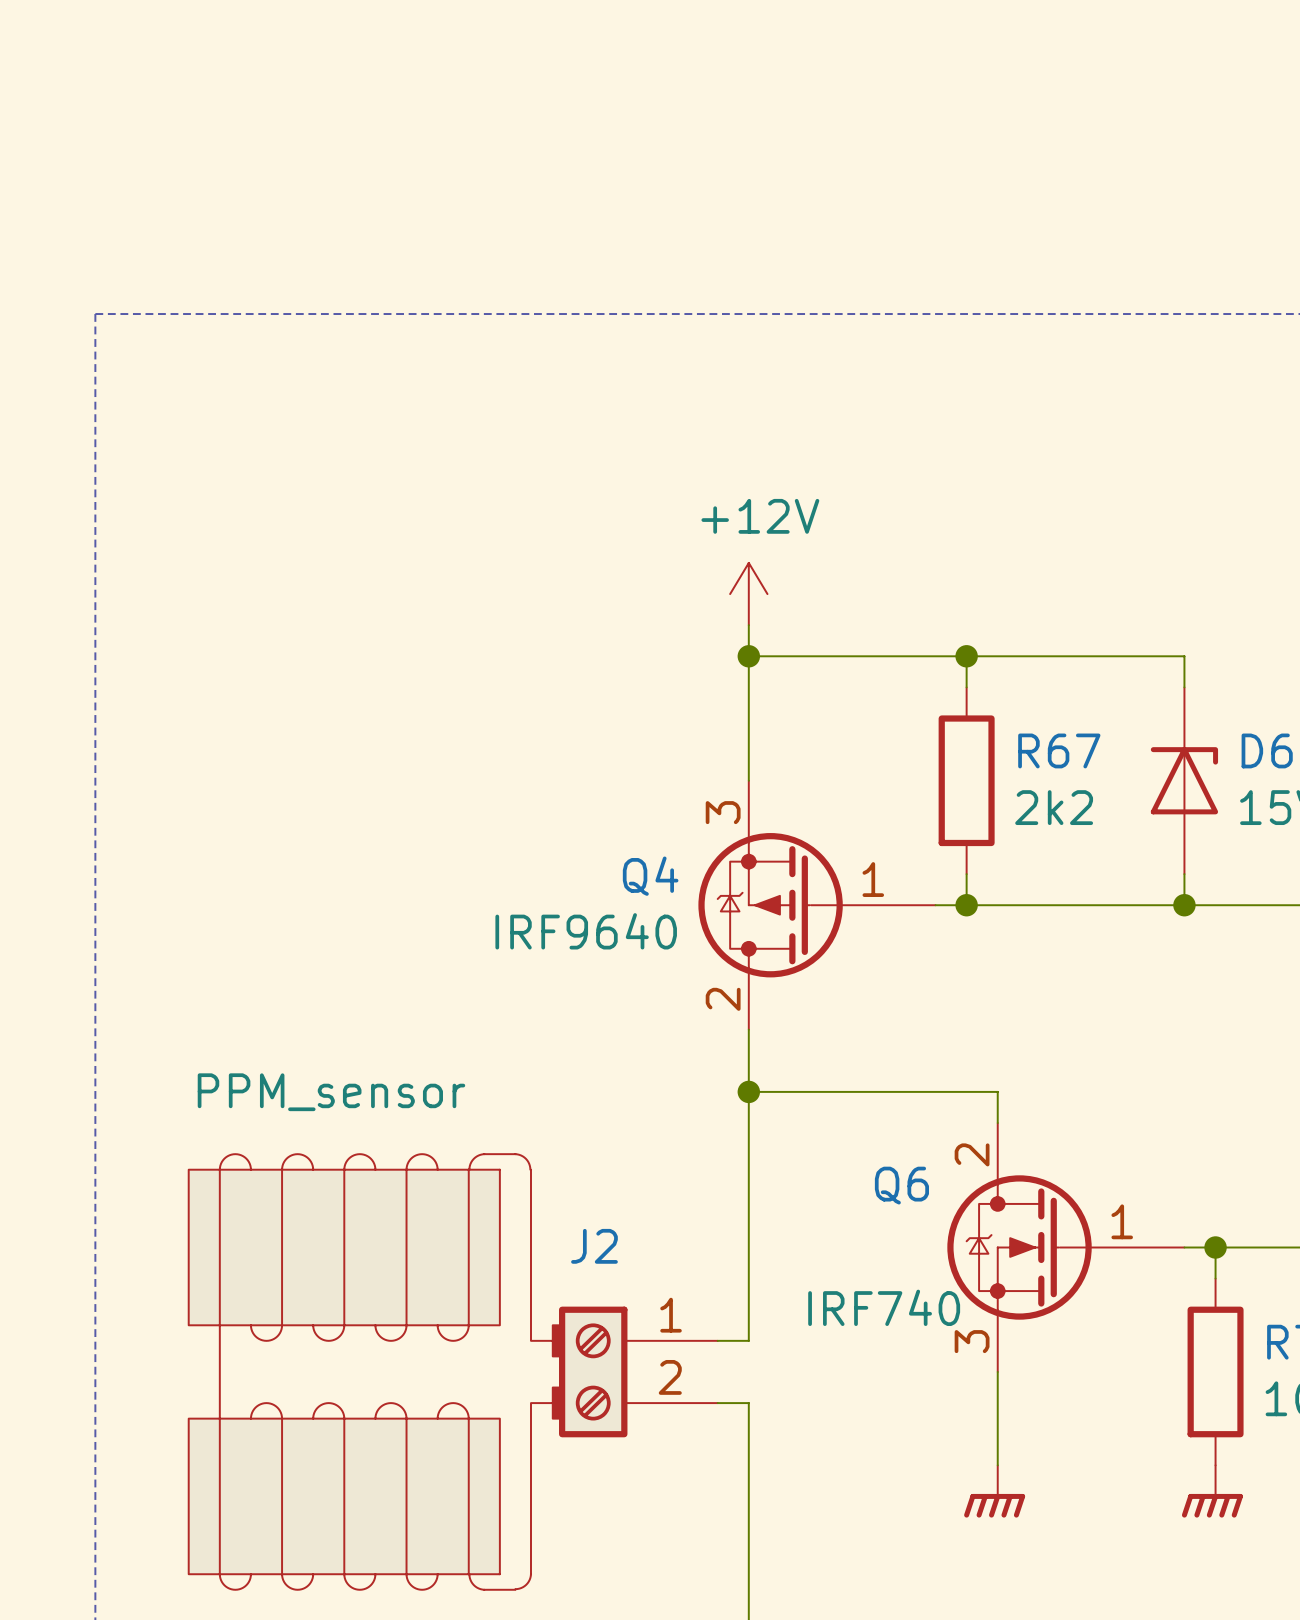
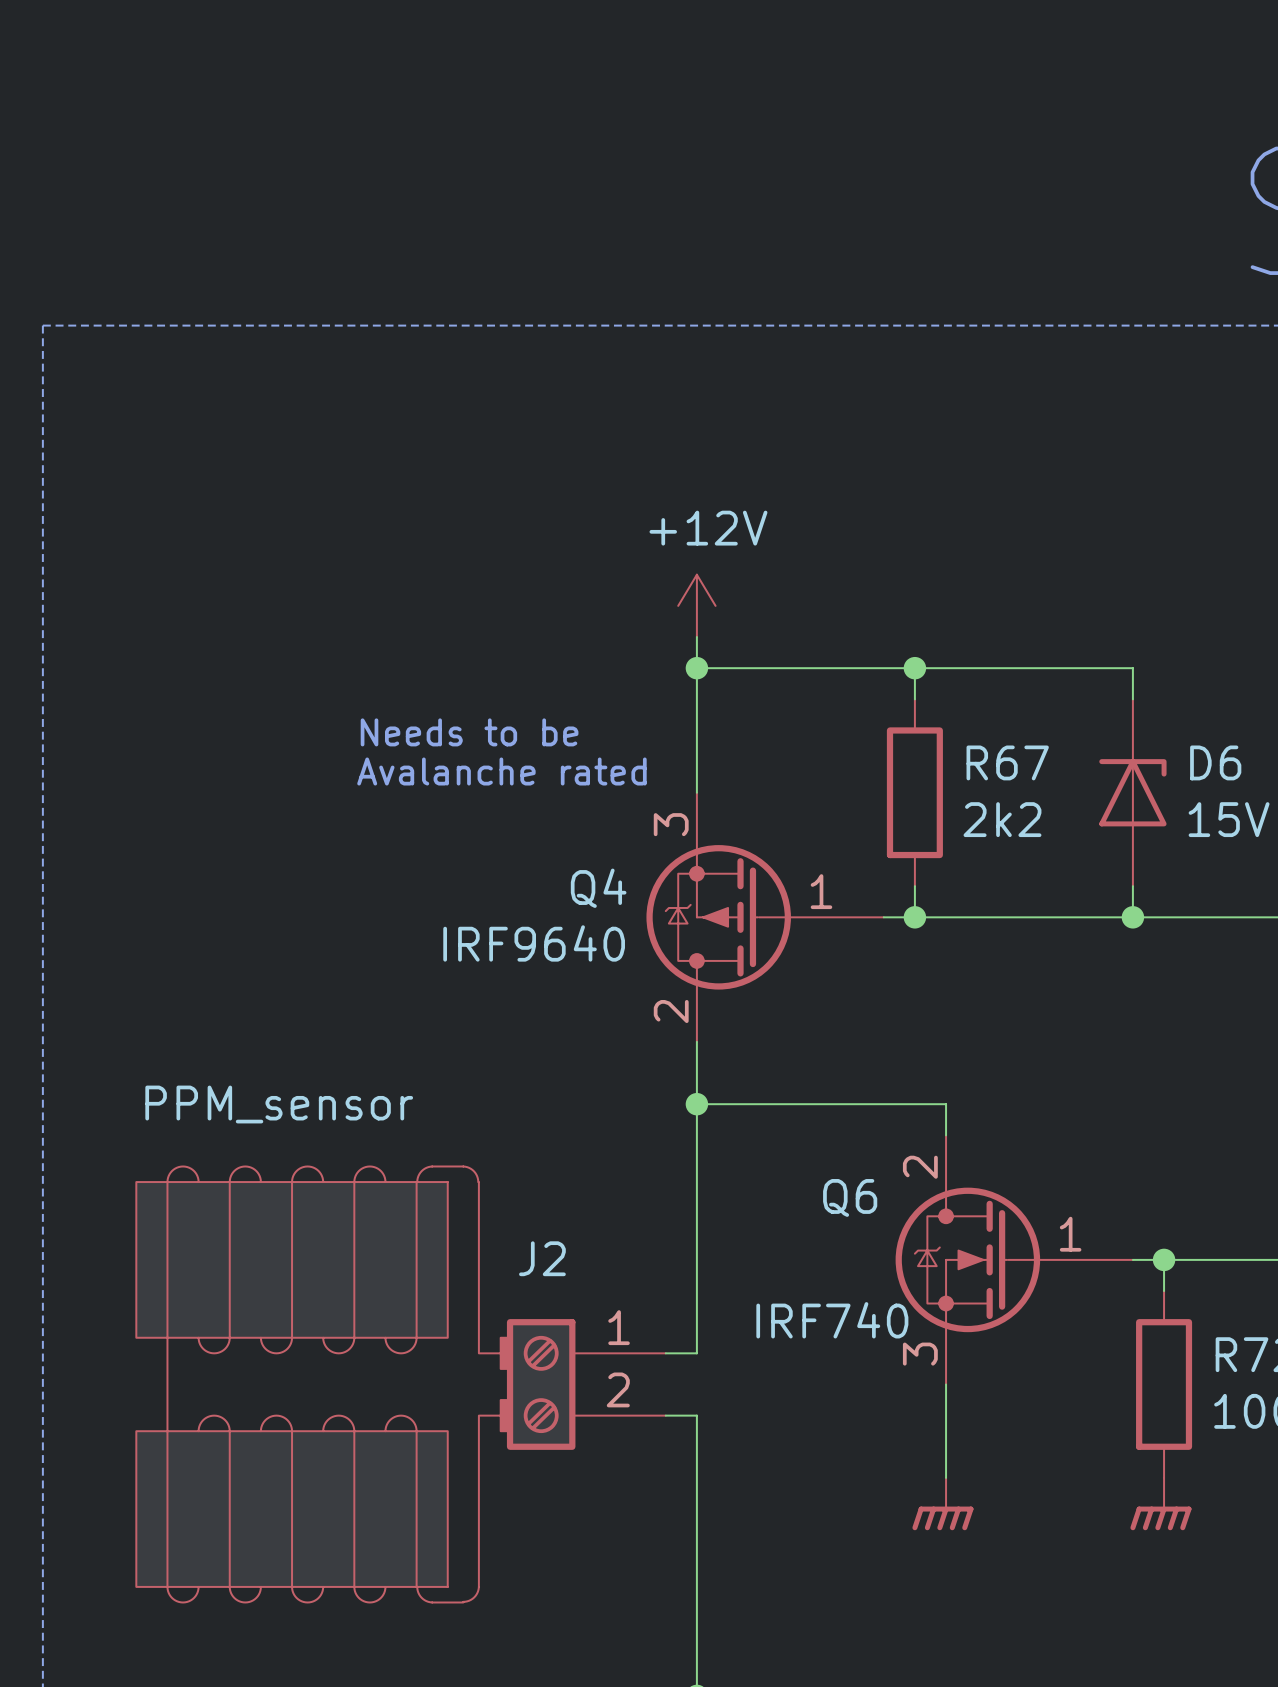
text: none -> Needs to be (469, 732)
text: none -> Avalanche rated (501, 771)

